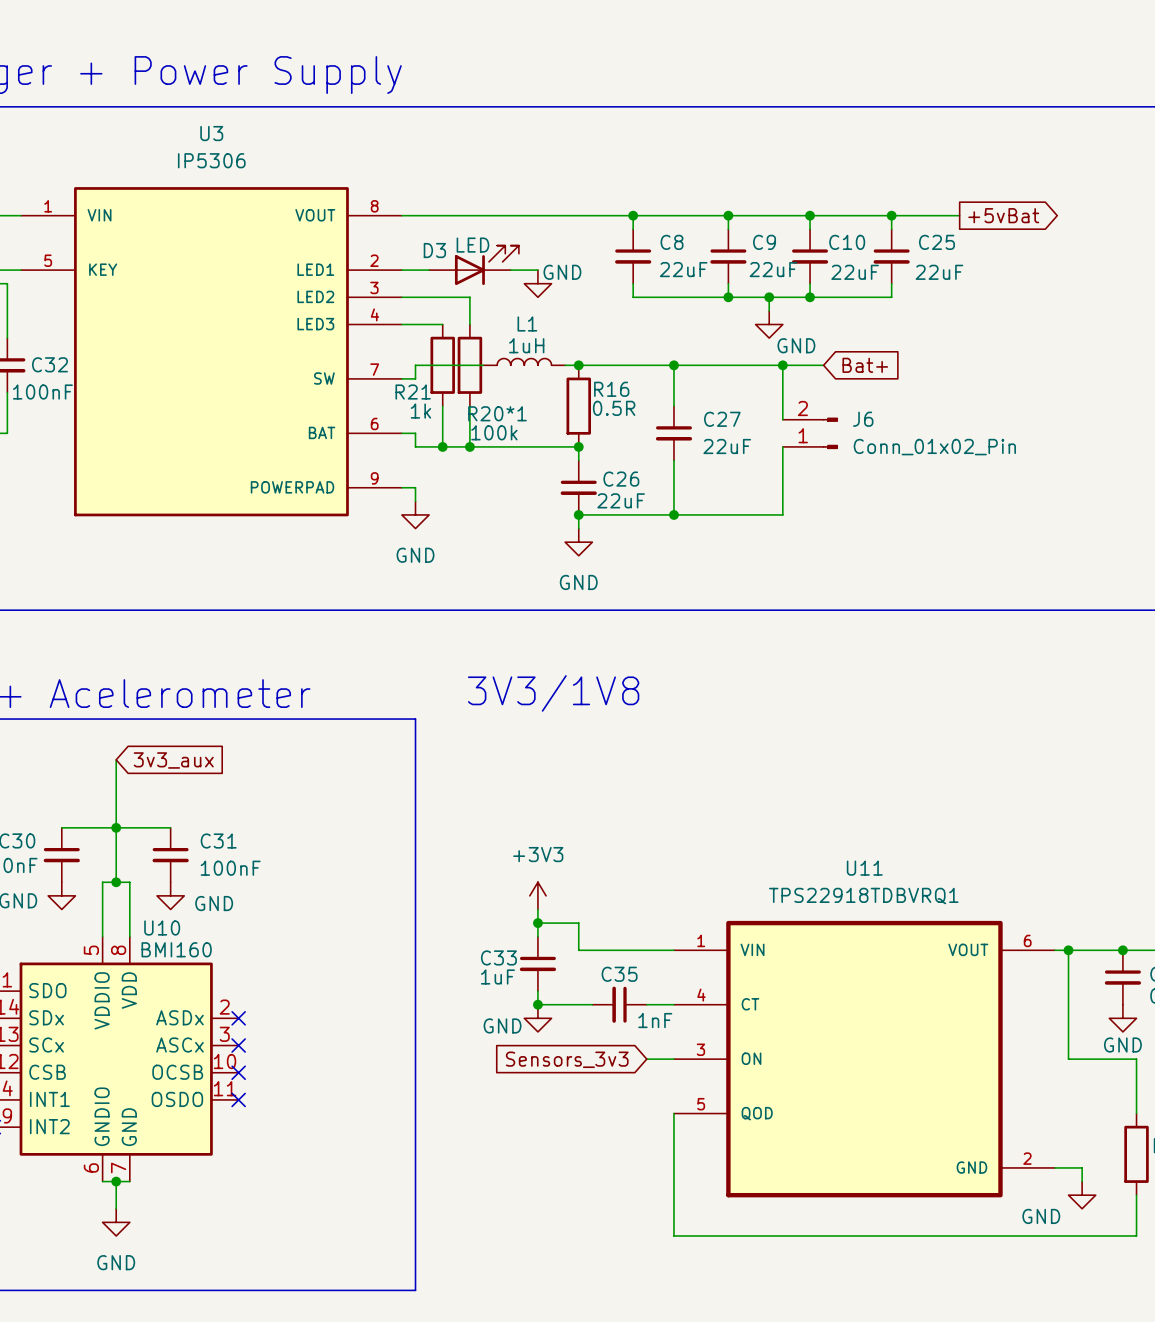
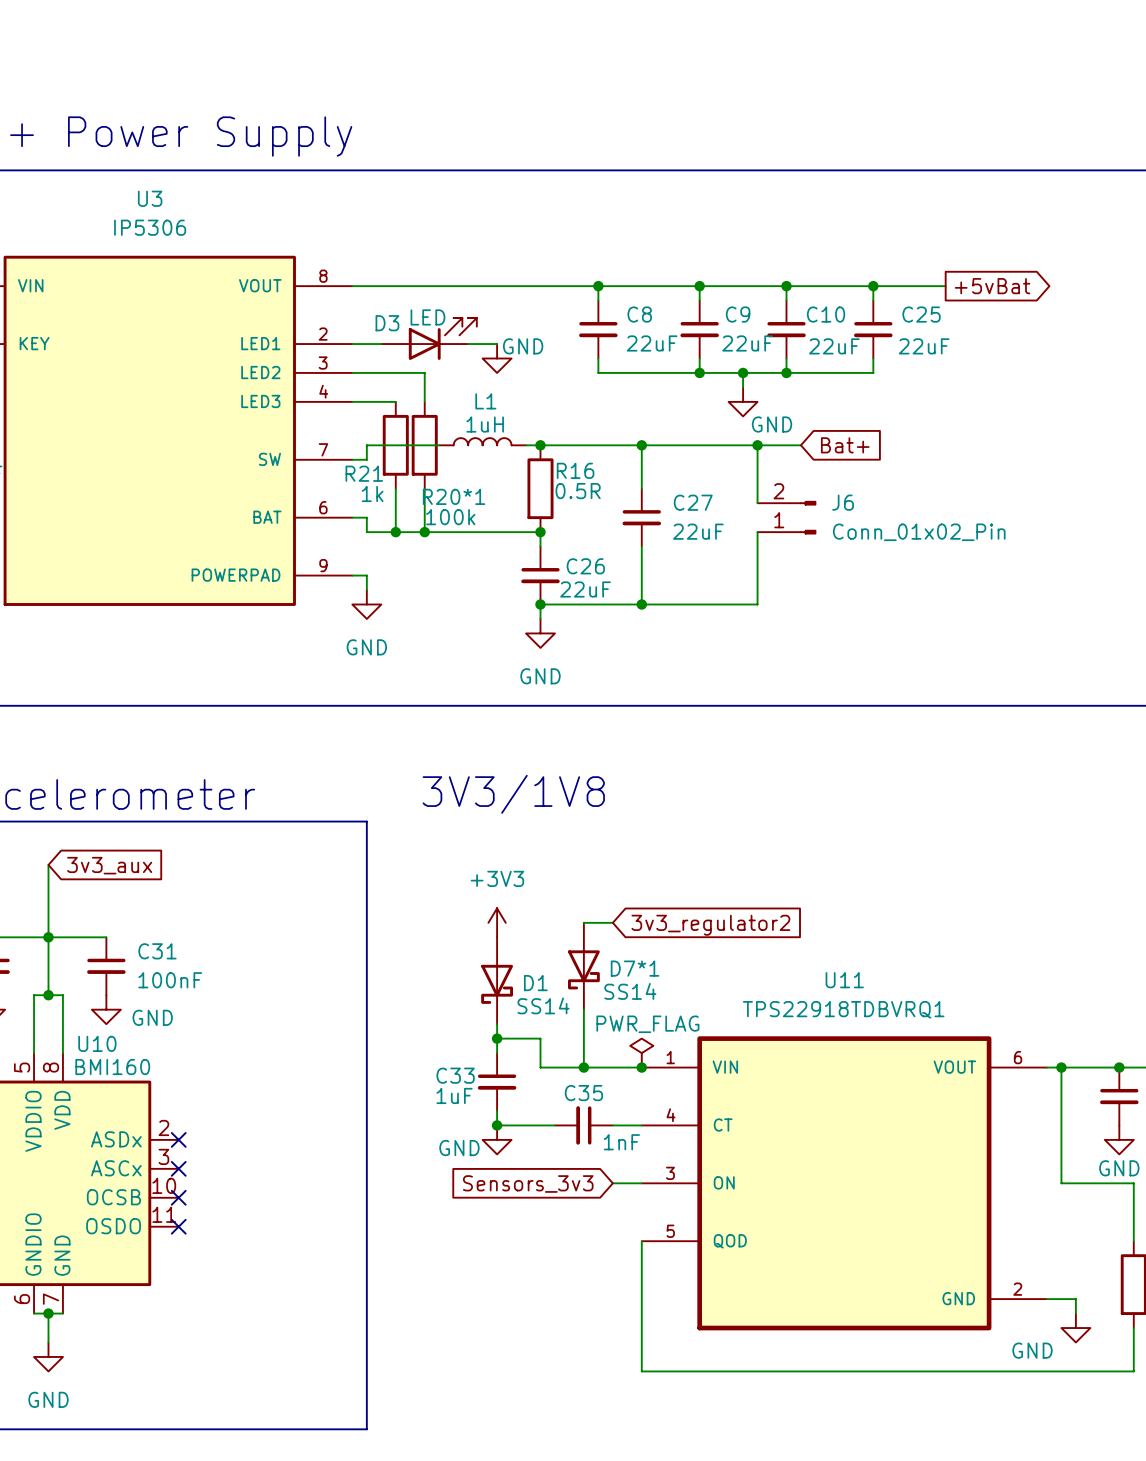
wire: none -> (583, 922) (612, 922)
global label: none -> 3v3_regulator2 (710, 925)
D7*1: none -> SS14 (583, 966)
D1: none -> SS14 (497, 980)
power symbol position: +3V3 (537, 895) -> +3V3 (497, 922)
wire: none -> (583, 1009) (583, 1067)
power symbol: none -> PWR_FLAG (641, 1053)
junction: none -> (583, 1067)
junction: none -> (641, 1067)

